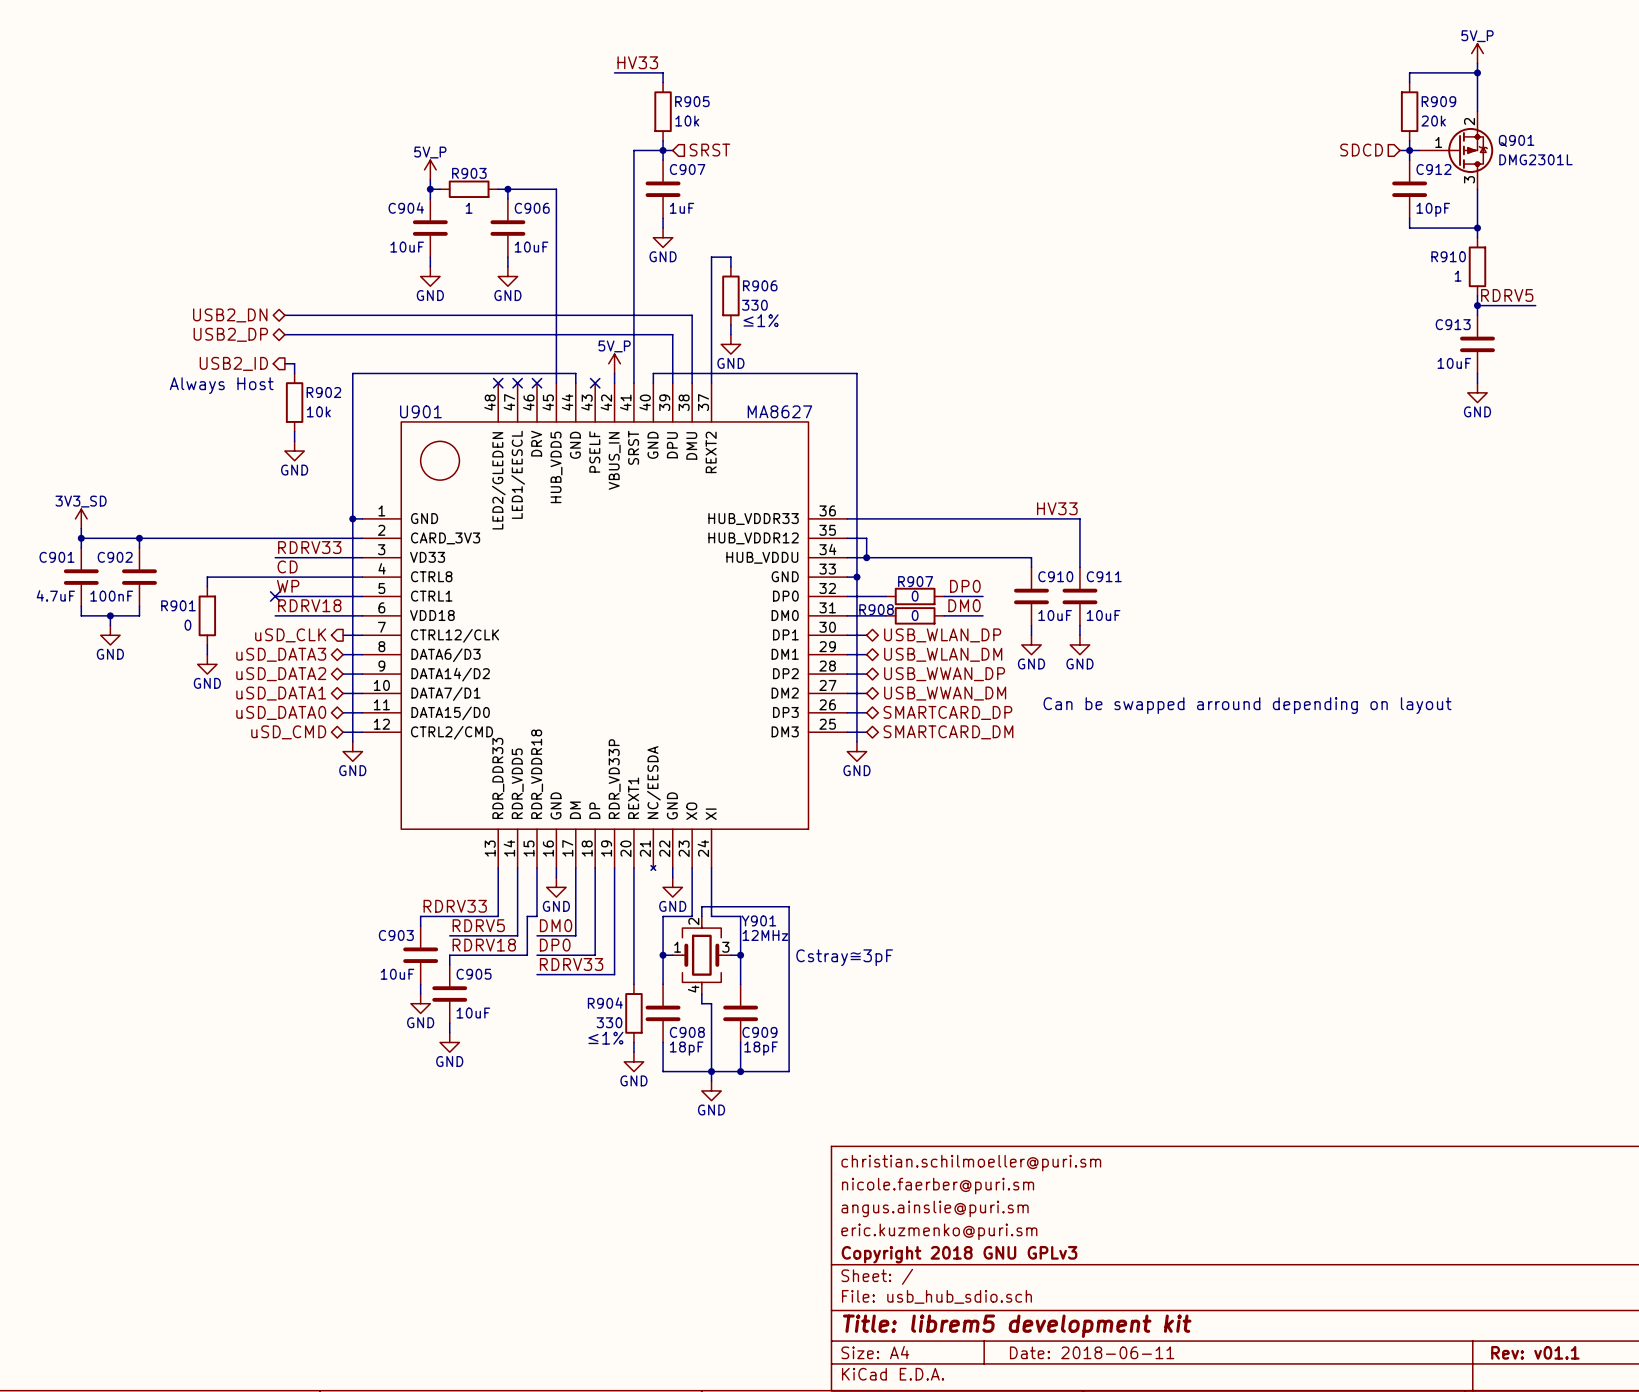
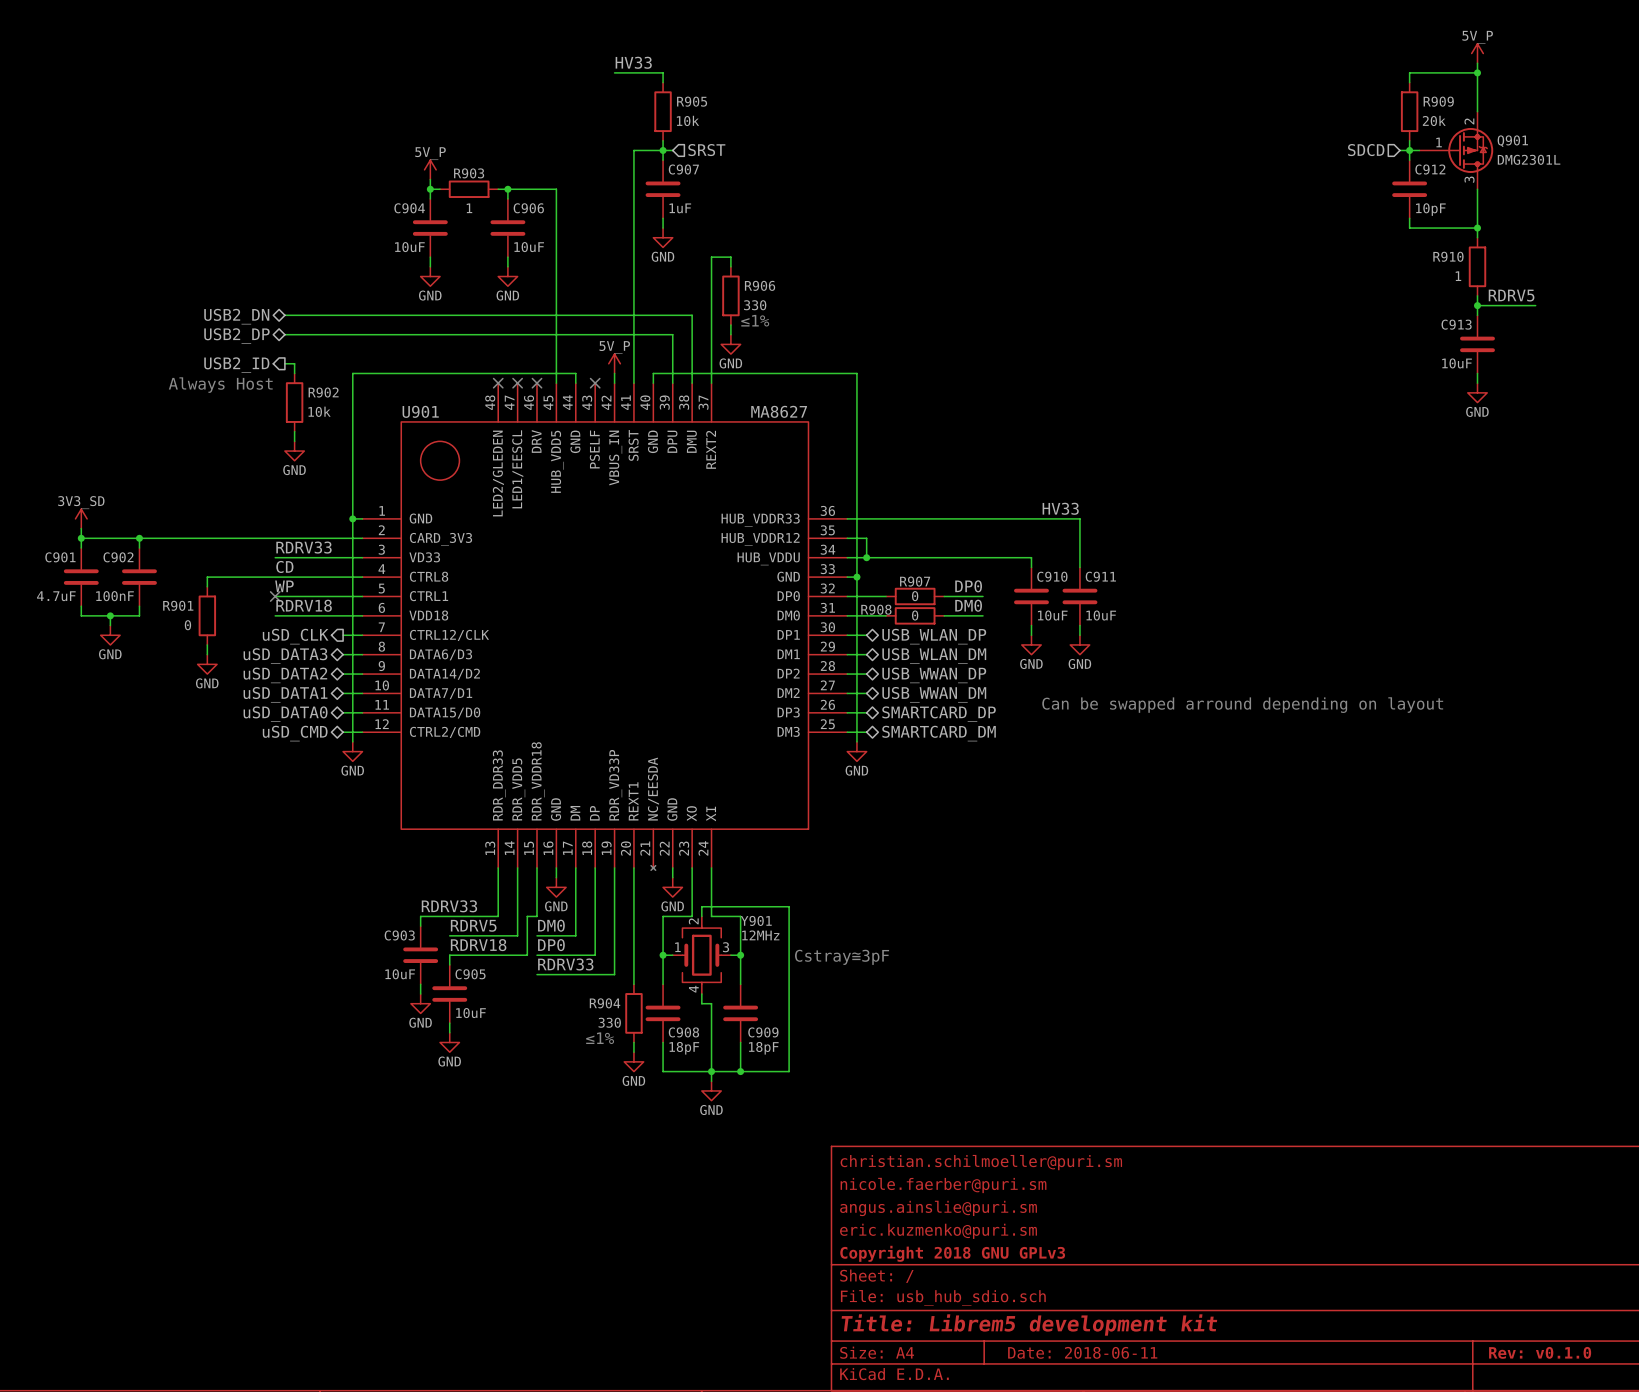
title block: Title: librem5 development kit (1017, 1326) -> Title: Librem5 development kit (1029, 1324)
title block: Rev: v01.1 (1535, 1352) -> Rev: v0.1.0 (1540, 1352)

